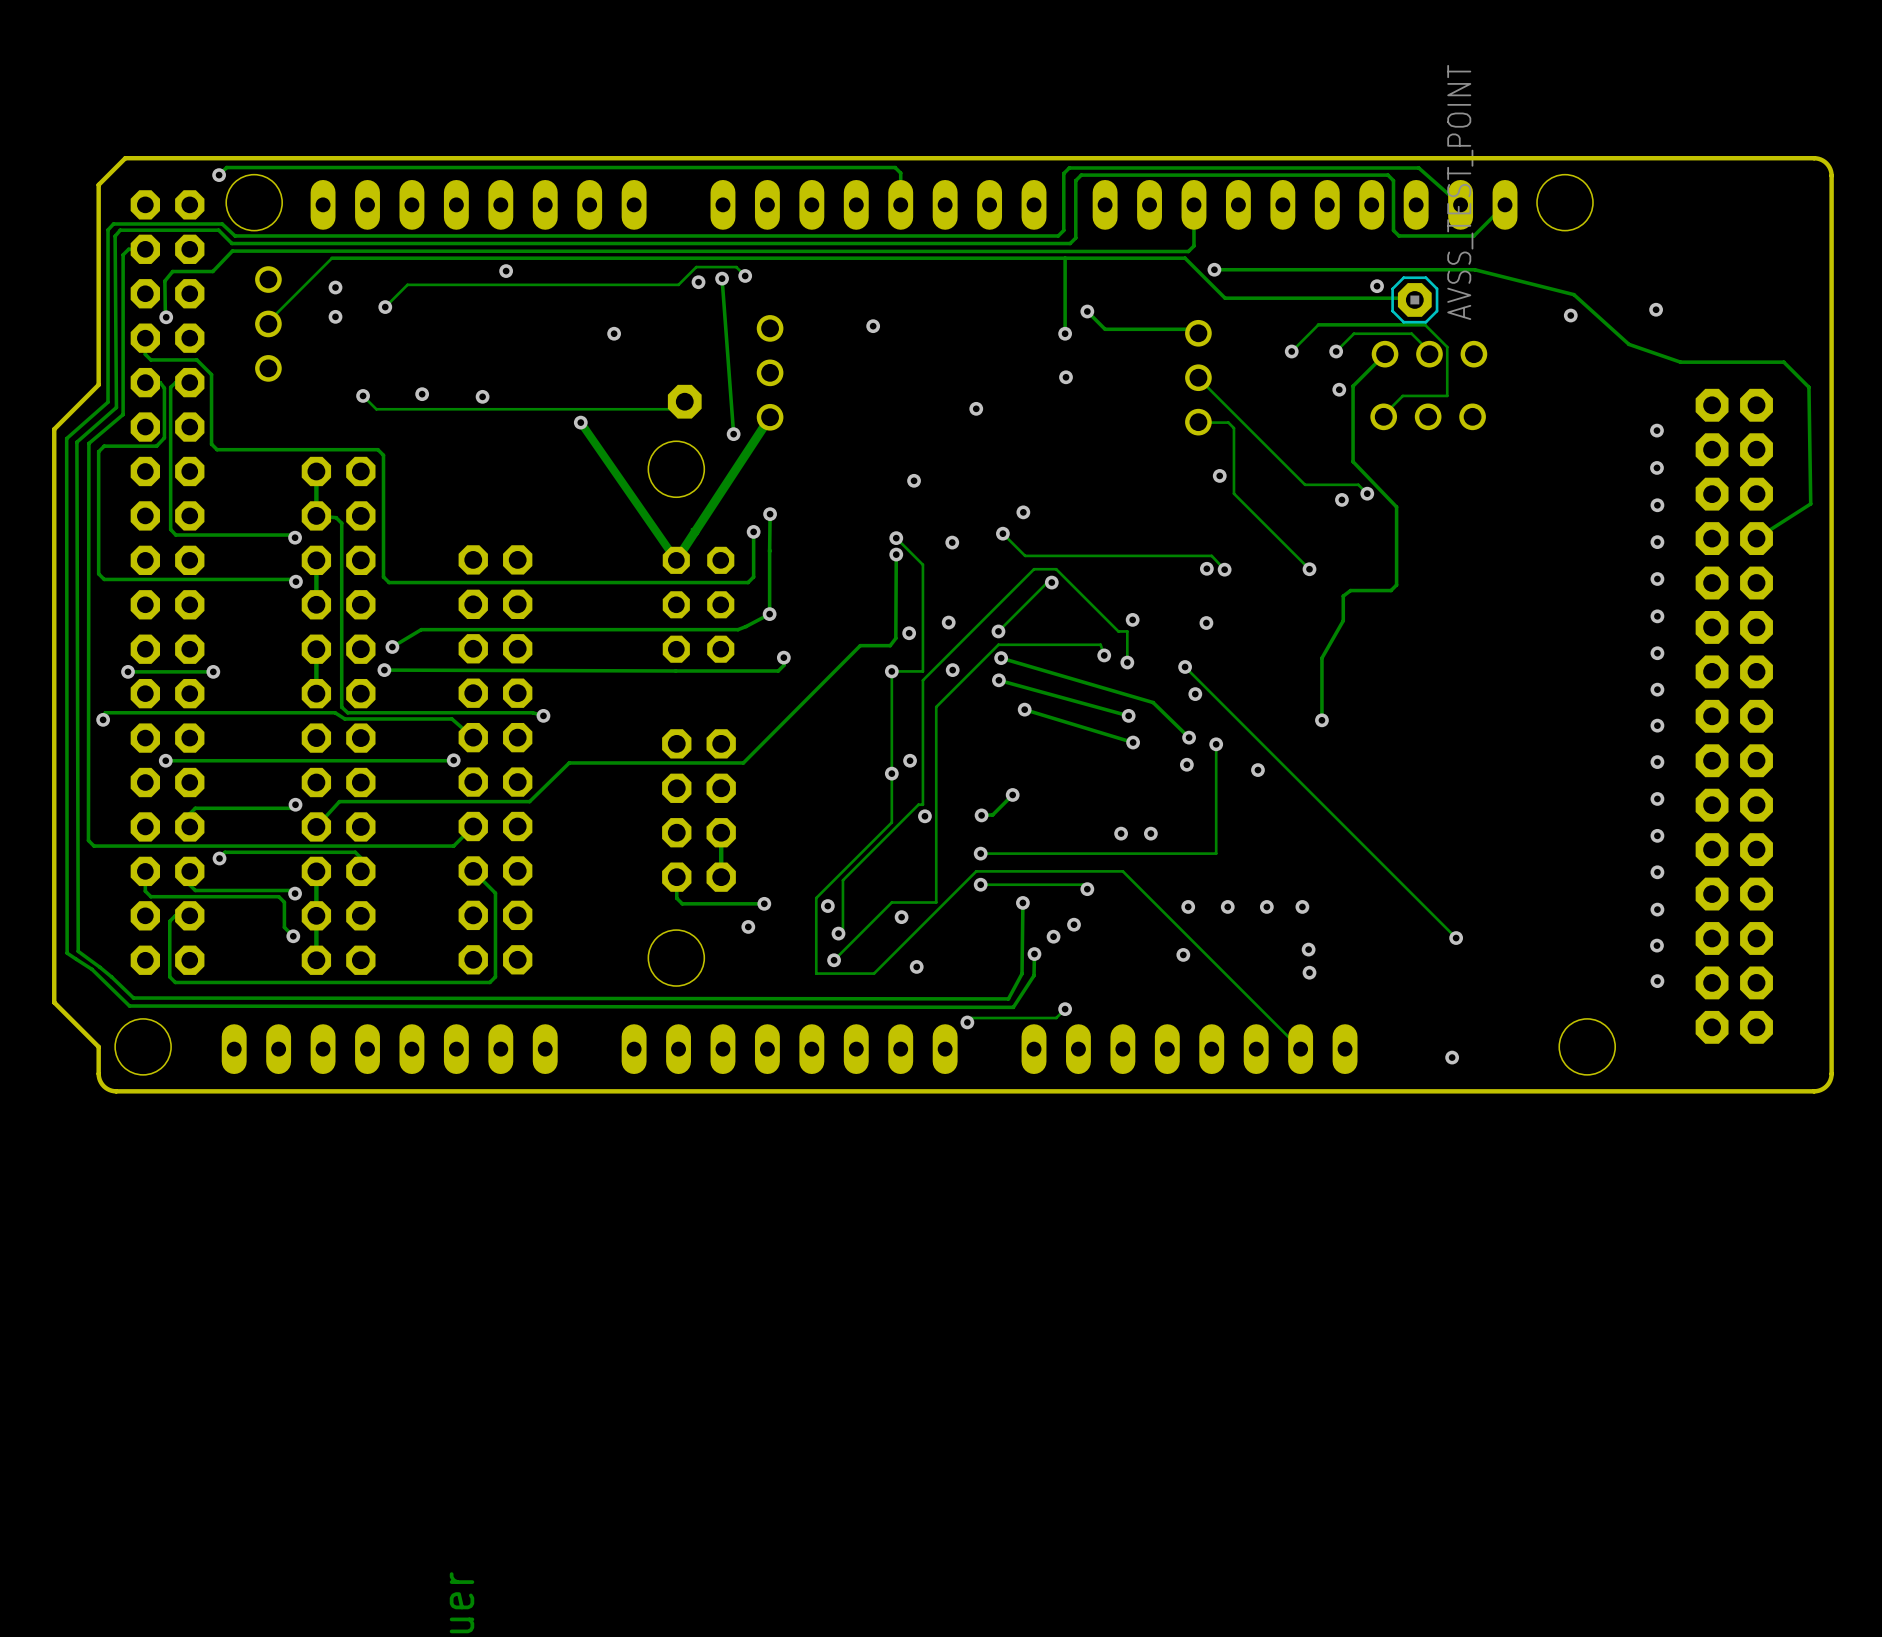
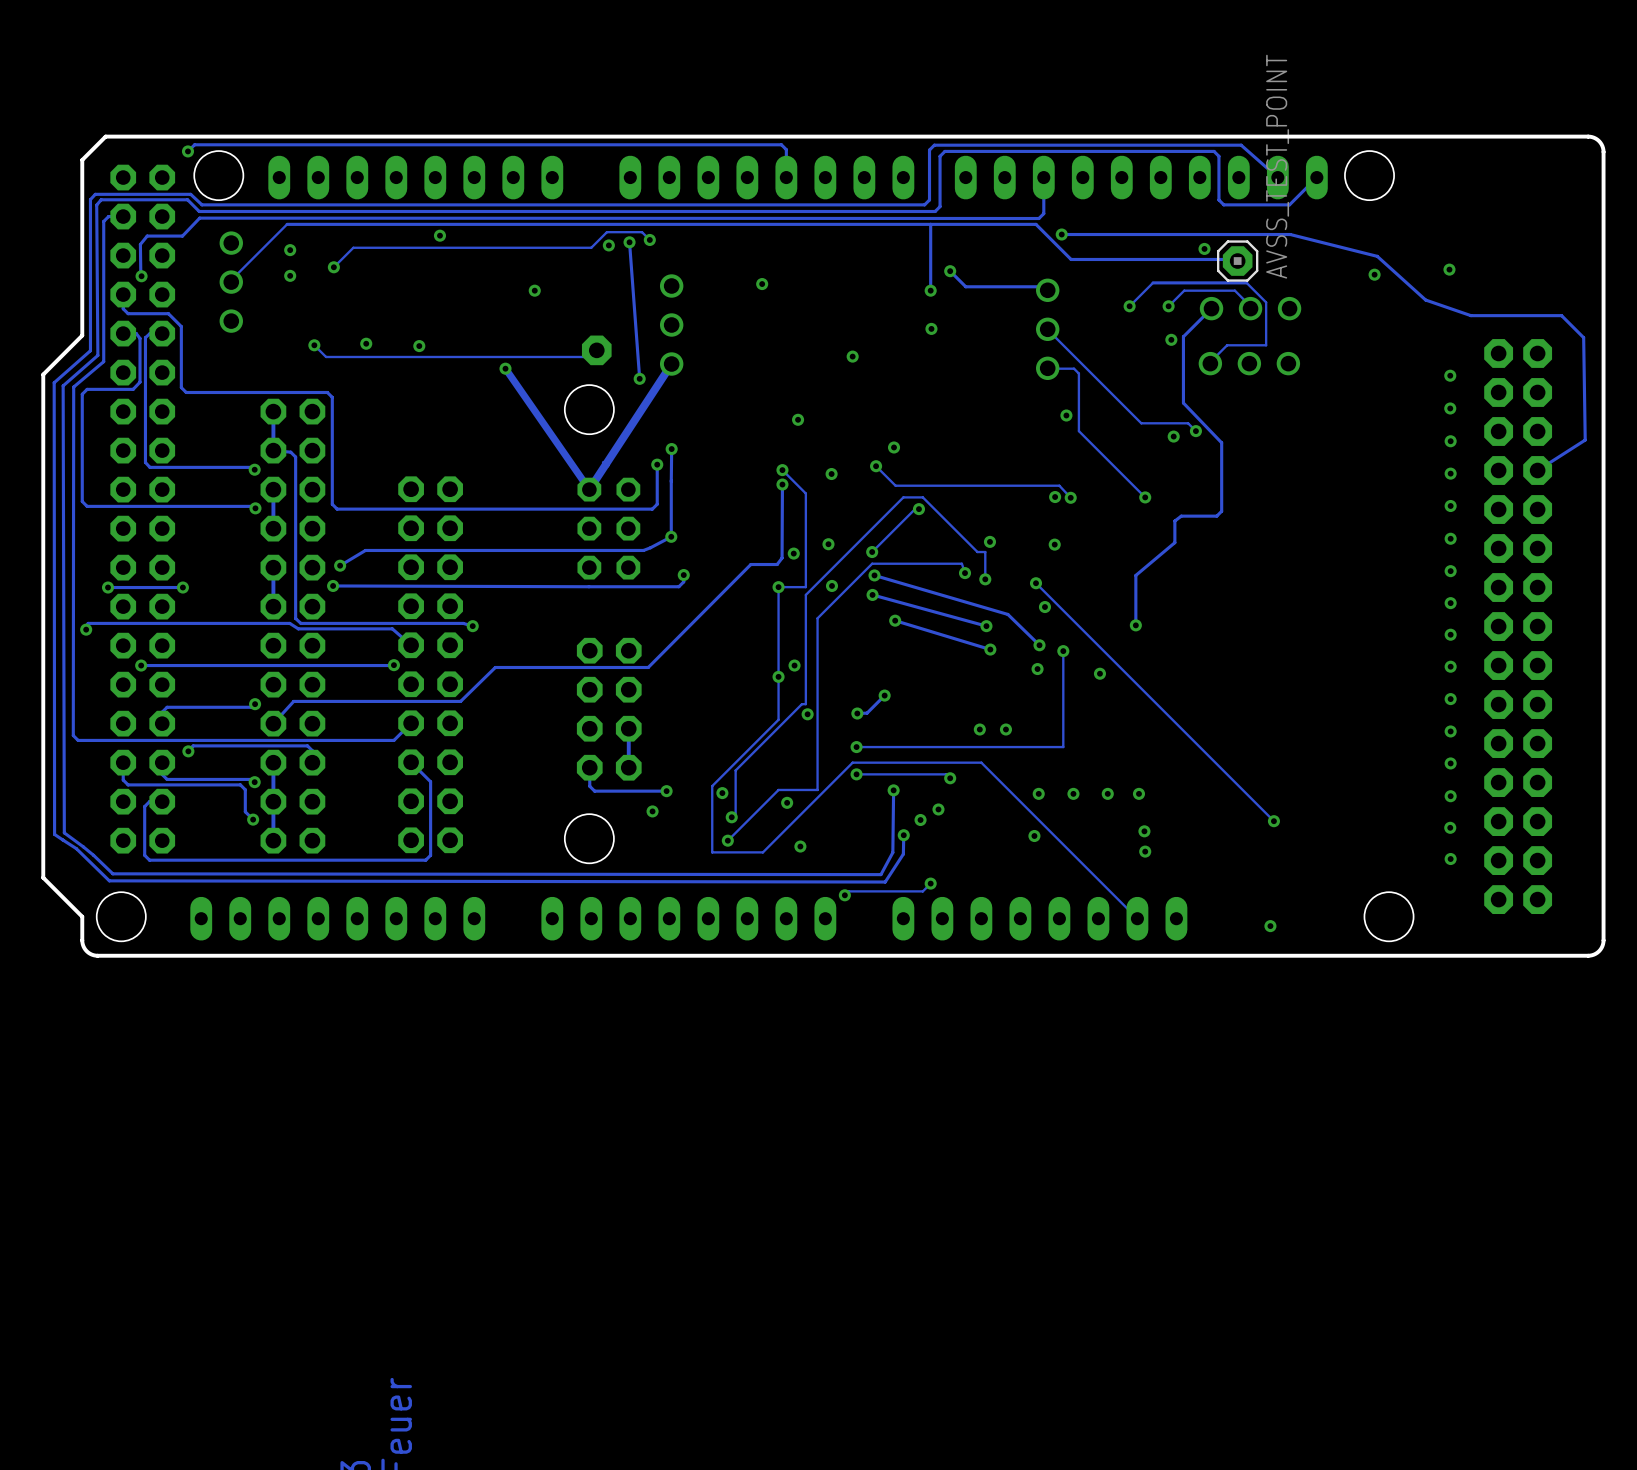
track: (1343, 620) (1321, 658) (1321, 720) -> (1174, 542) (1135, 575) (1135, 625)
via position: (1321, 720) -> (1135, 625)

